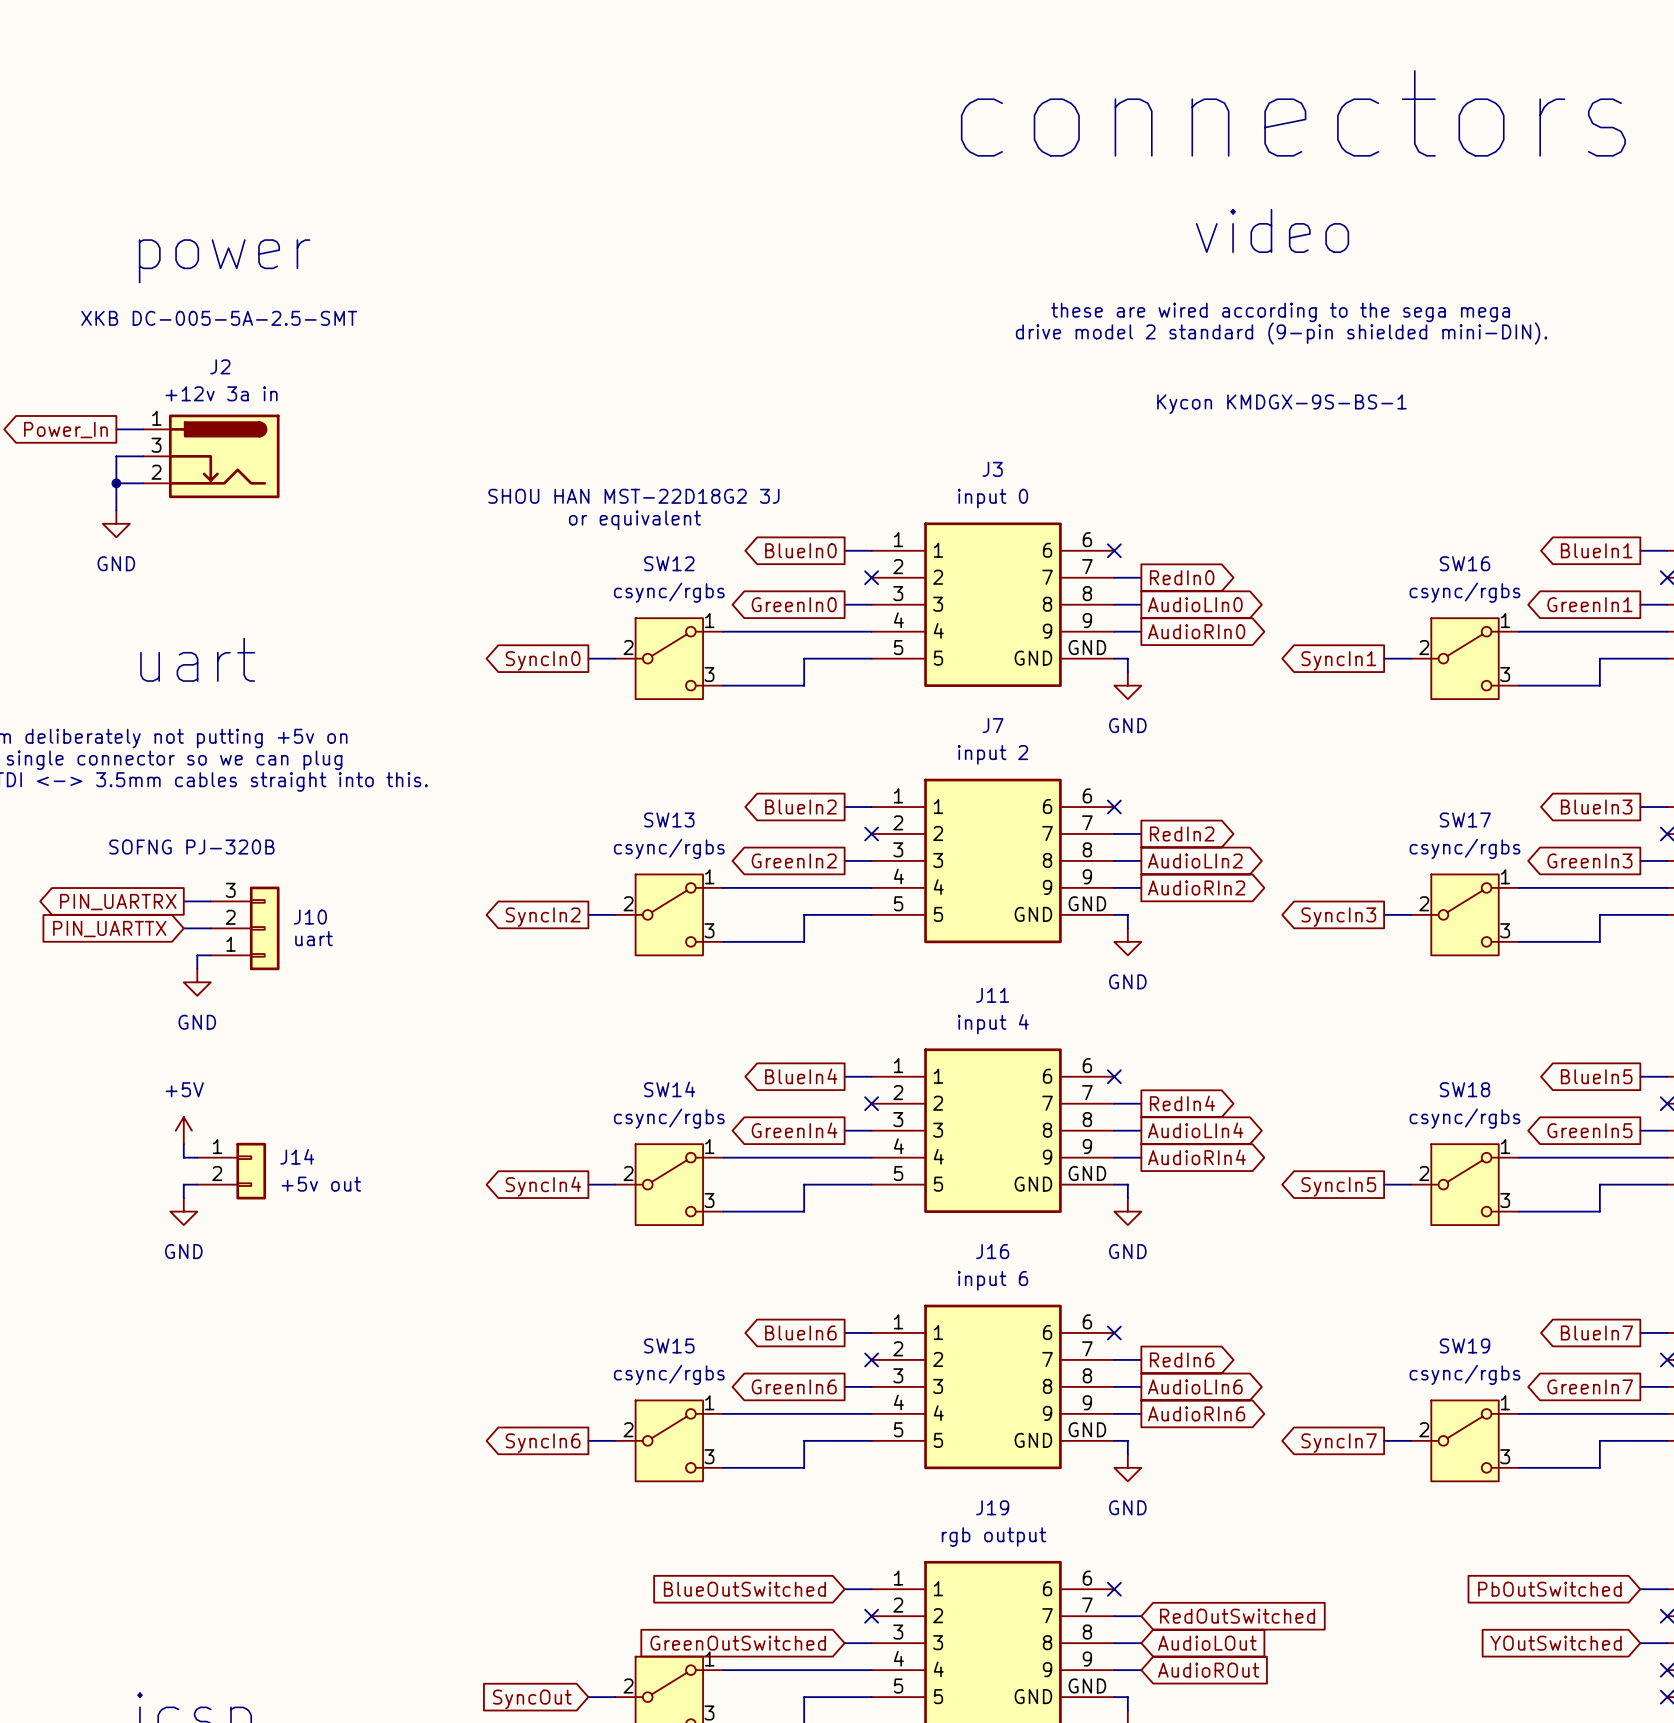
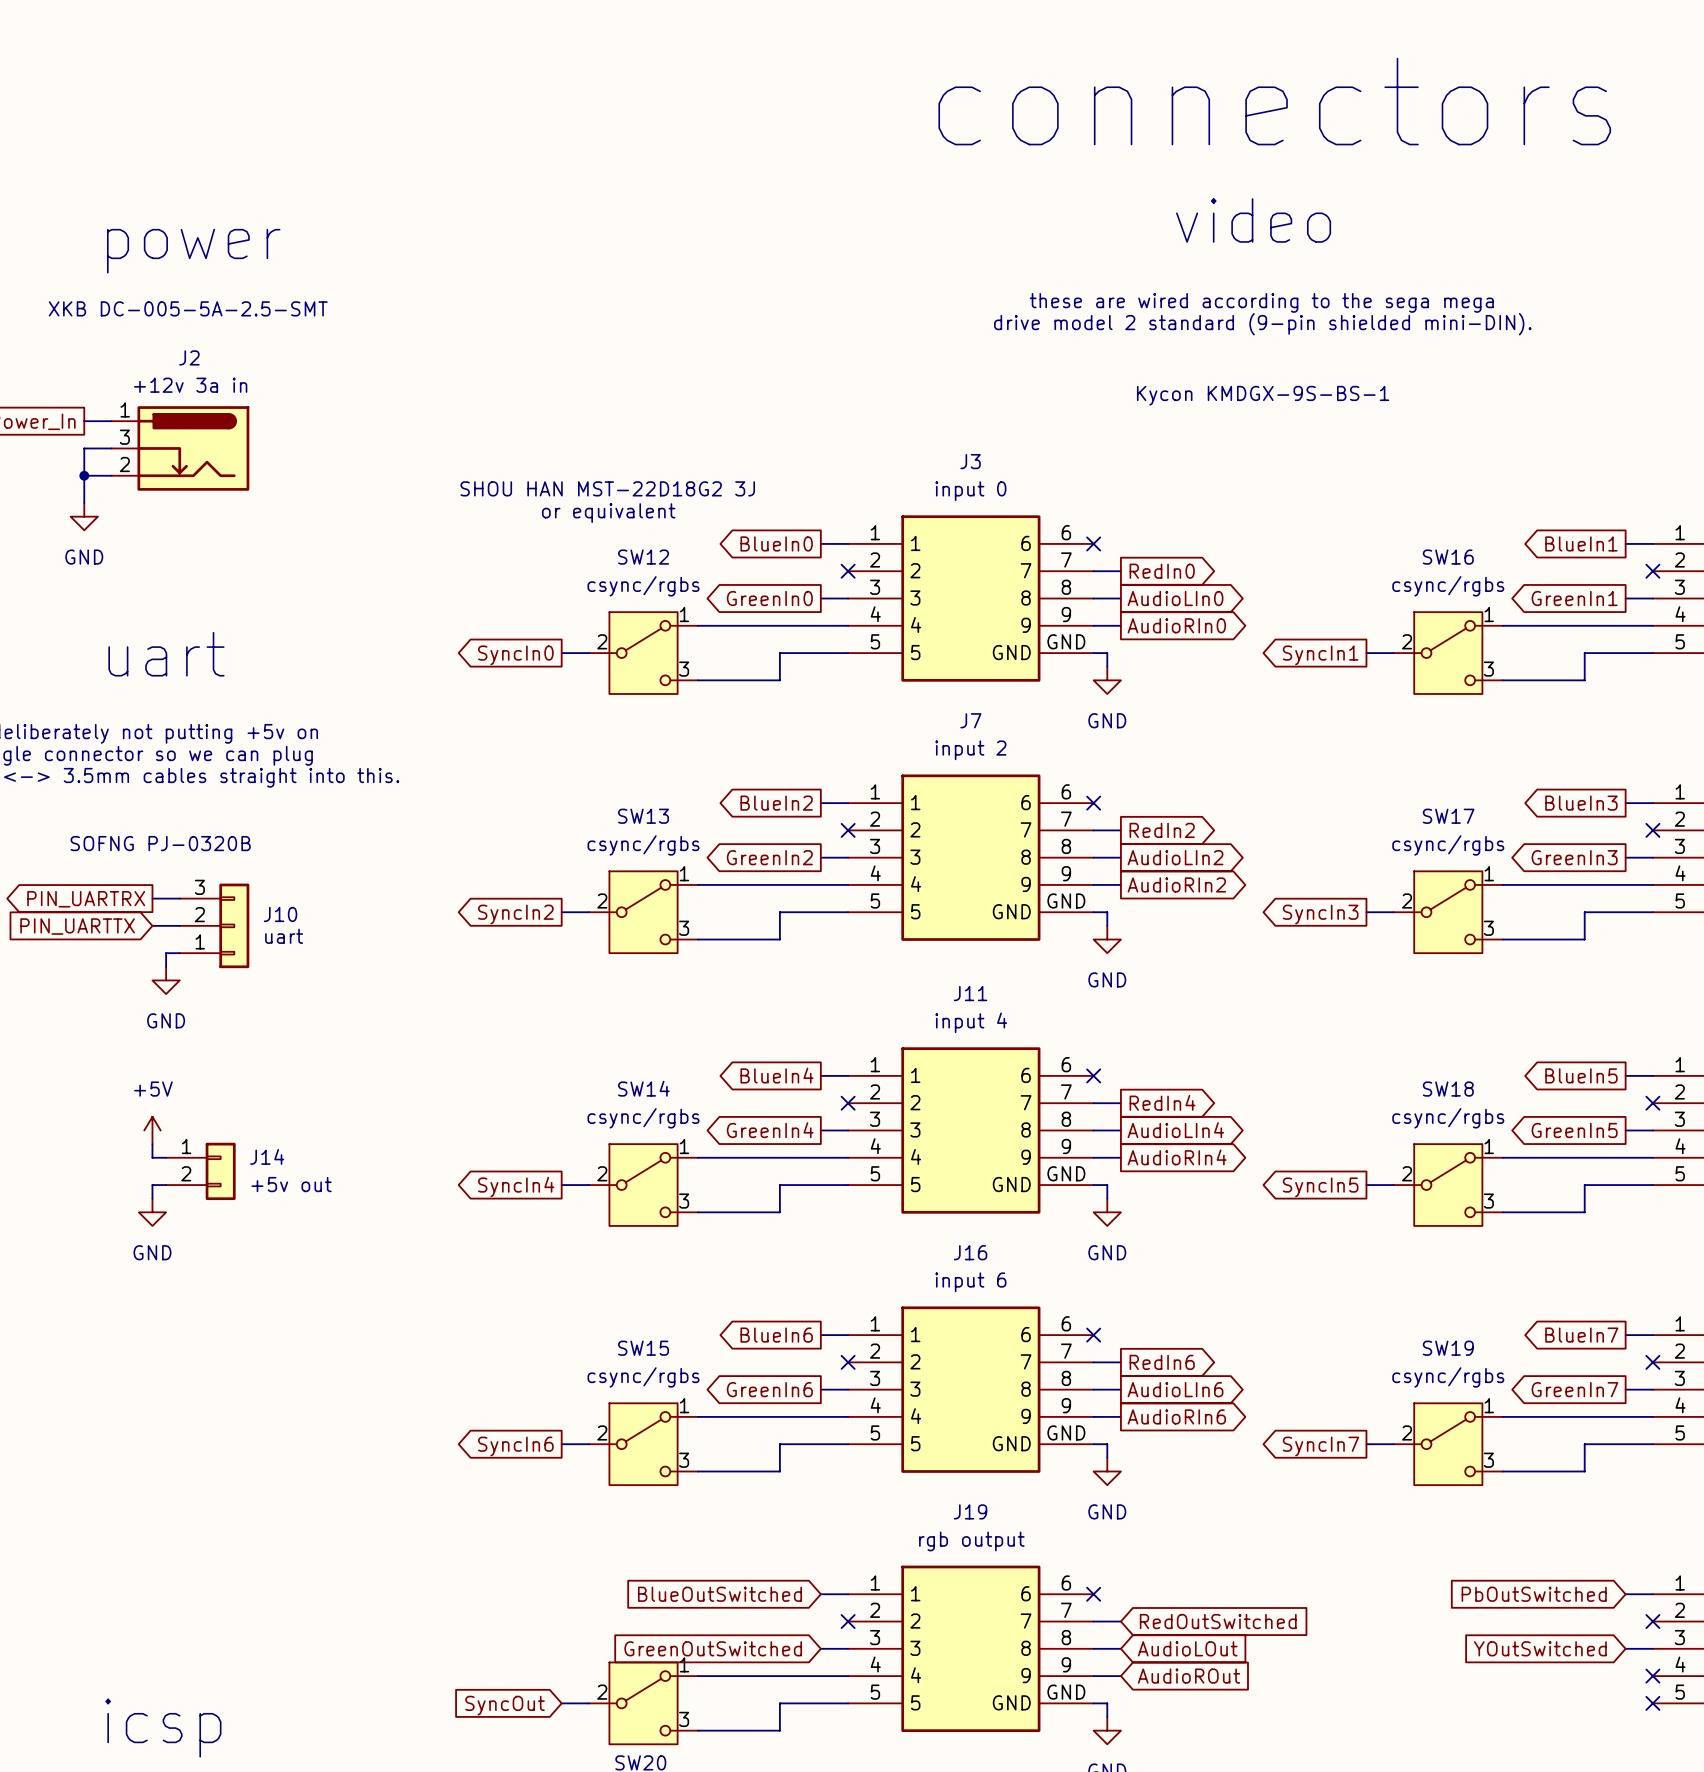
text: SOFNG PJ-320B (191, 847) -> SOFNG PJ-0320B (160, 843)

